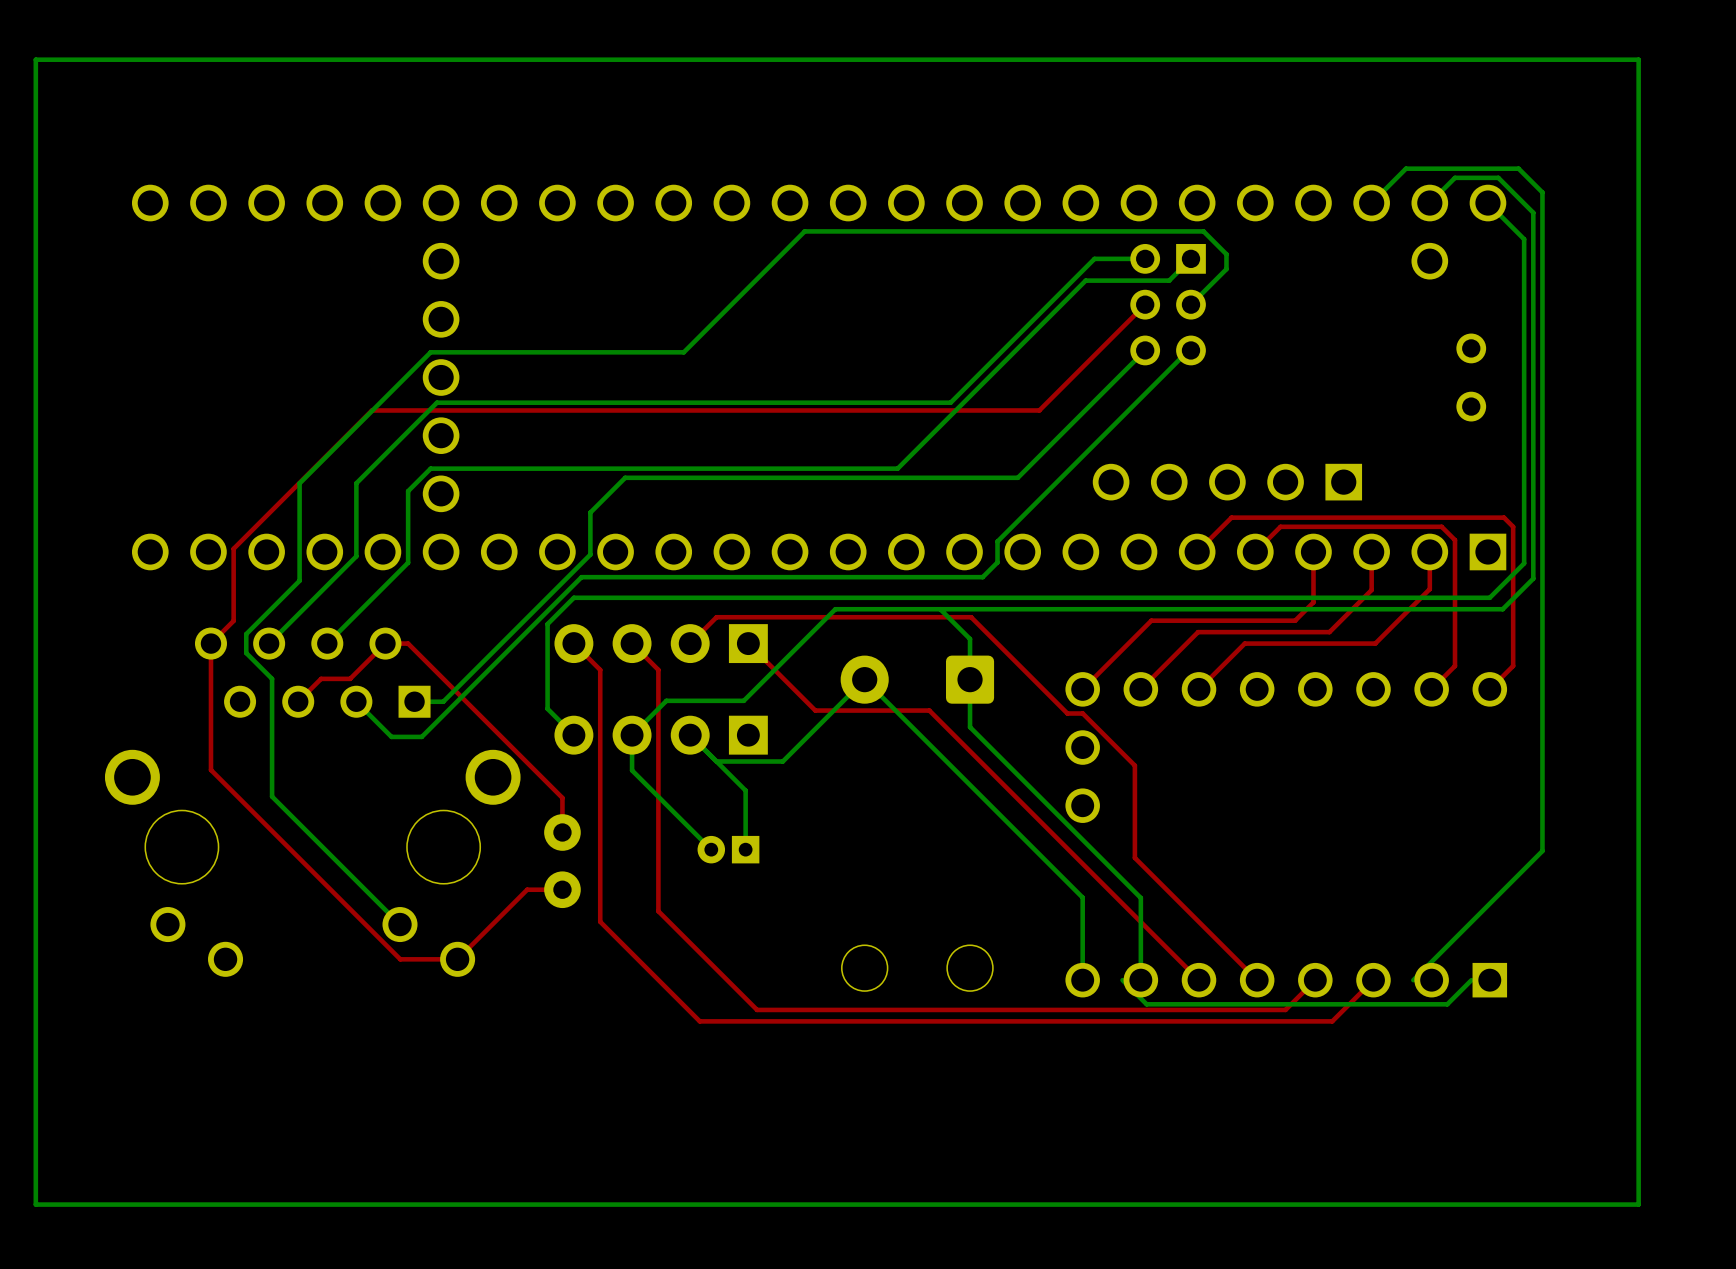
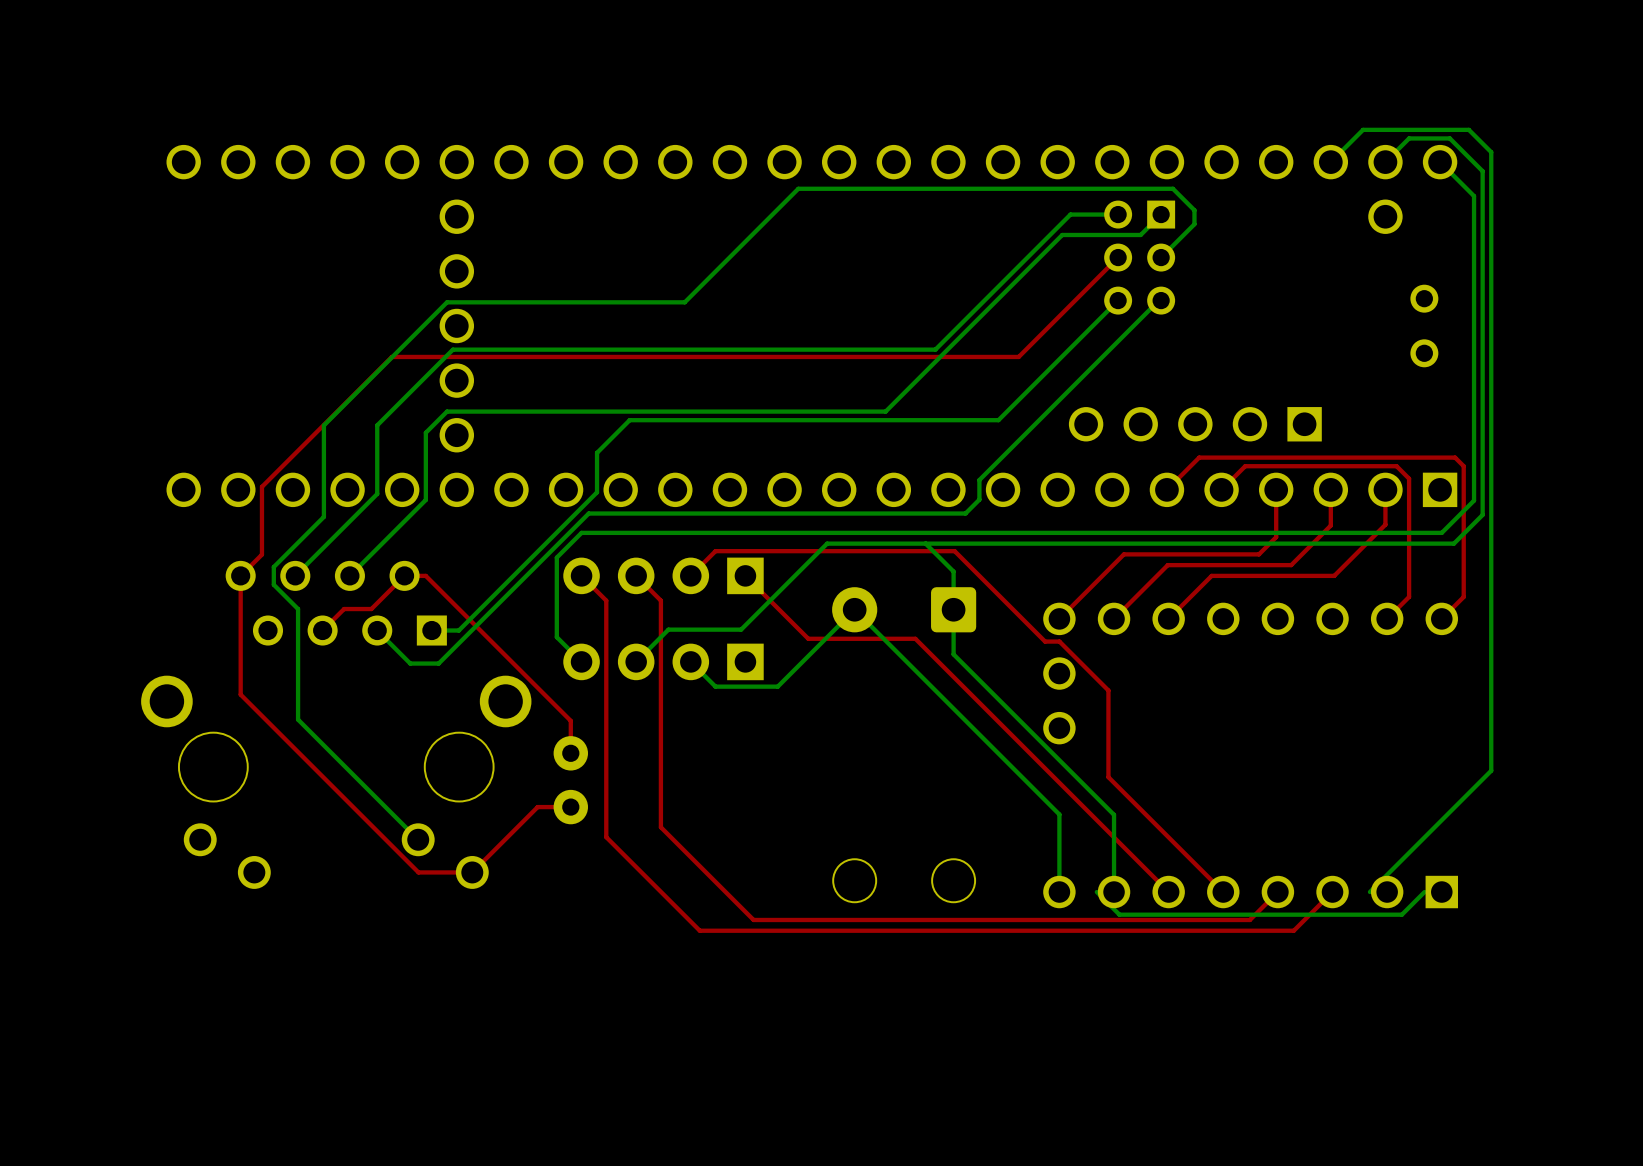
bottom track: (1638, 59) (35, 59) (35, 1204) (1638, 1204) (1638, 59) -> none
bottom track: (632, 735) (632, 770) (711, 849) -> none
bottom track: (716, 761) (745, 790) (745, 849) -> none
part: (728, 849) -> none

